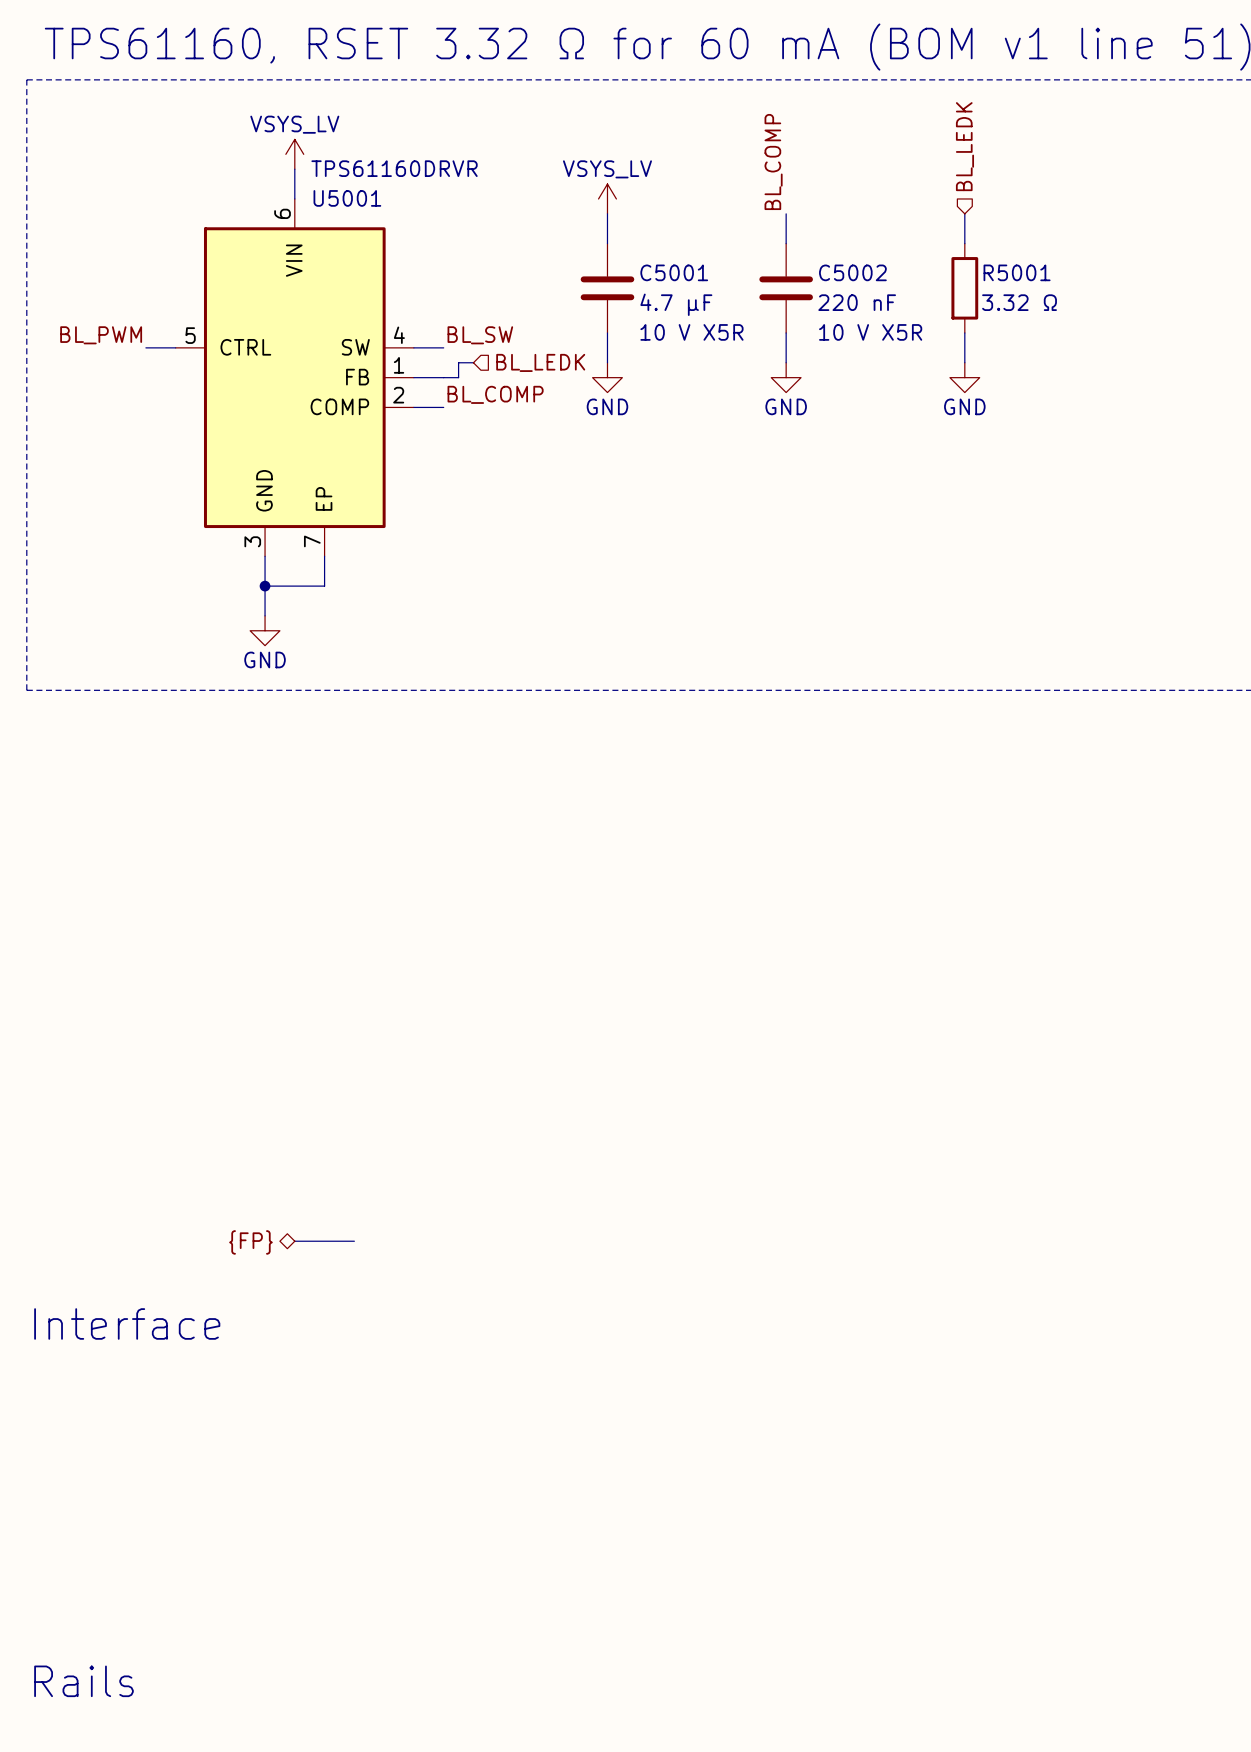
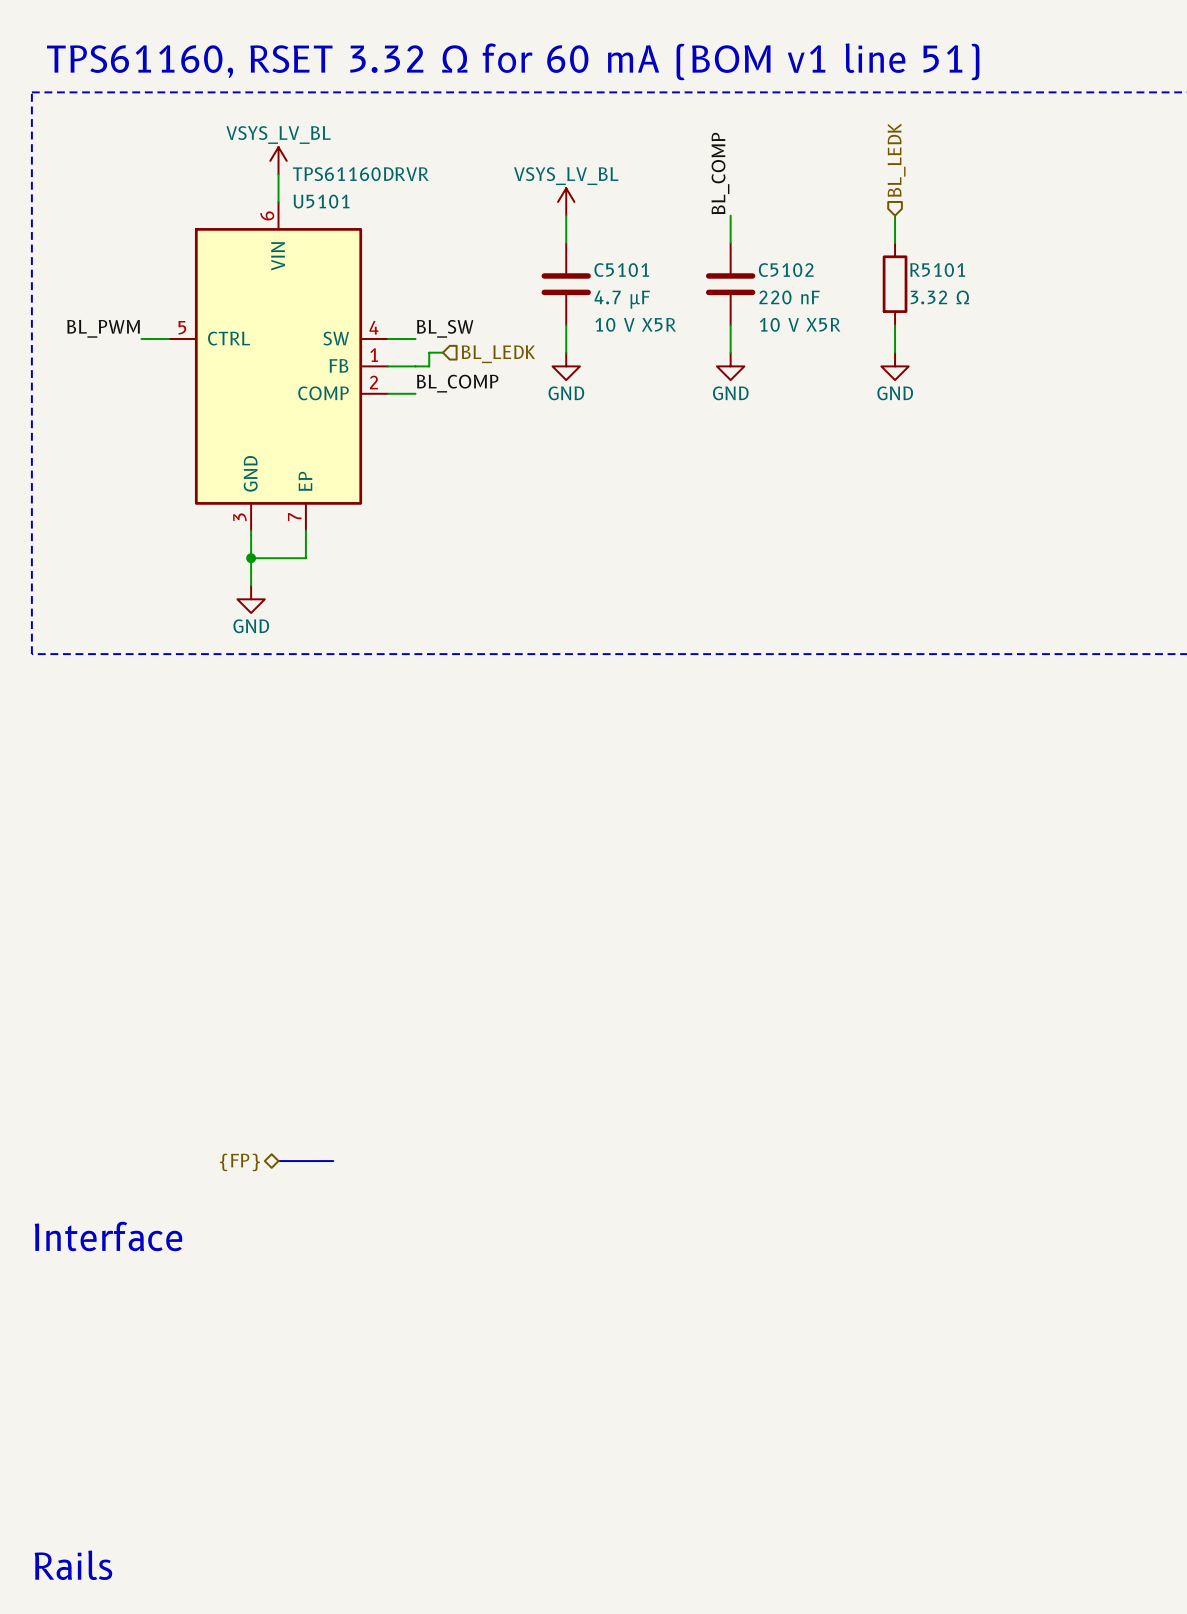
power symbol: VSYS_LV (294, 154) -> VSYS_LV_BL (278, 160)
U5001 name: U5001 (347, 198) -> U5101 (321, 201)
power symbol: VSYS_LV (607, 198) -> VSYS_LV_BL (566, 201)
C5001 name: C5001 (674, 272) -> C5101 (621, 270)
C5002 name: C5002 (852, 272) -> C5102 (786, 270)
R5001 name: R5001 (1017, 272) -> R5101 (937, 270)

